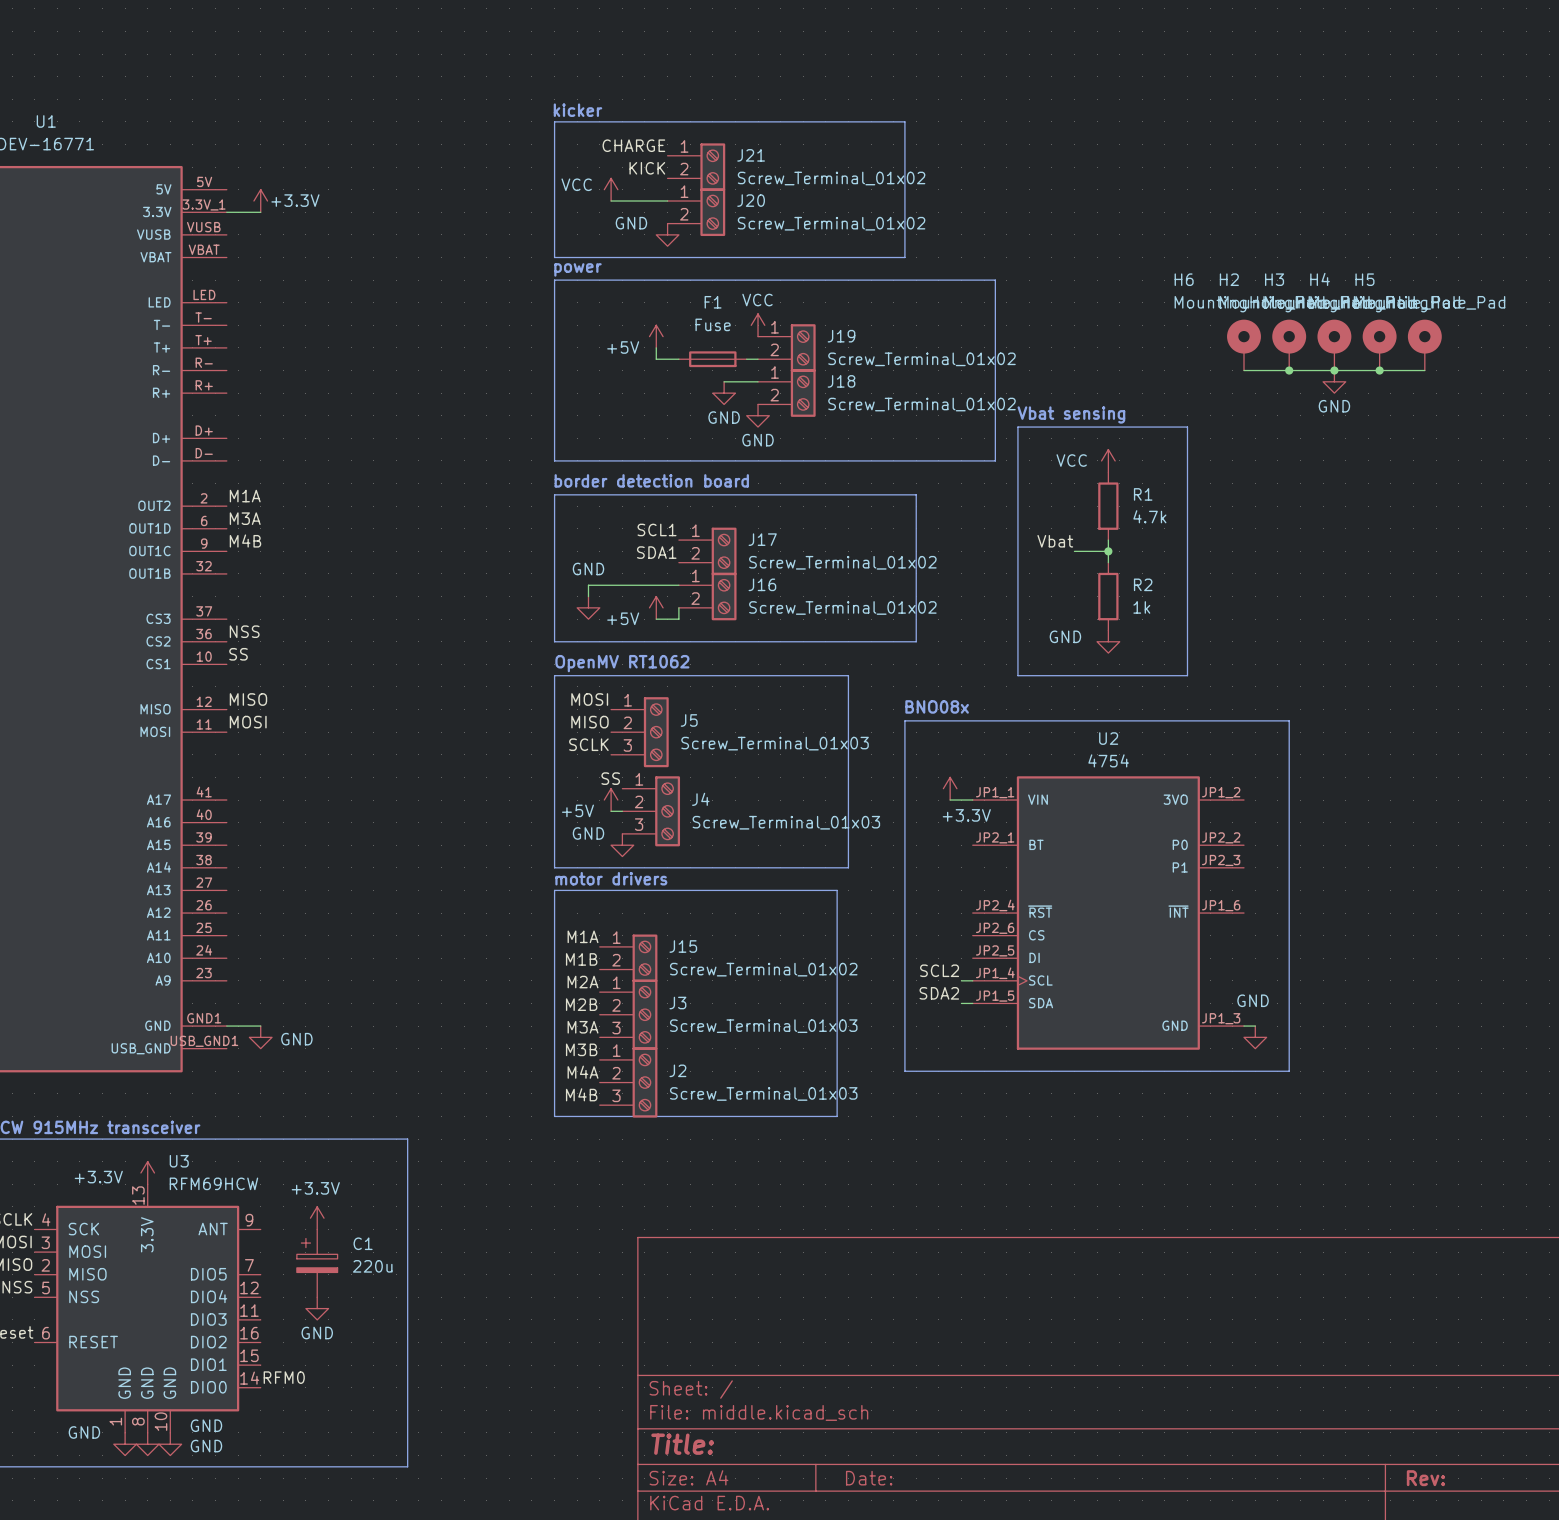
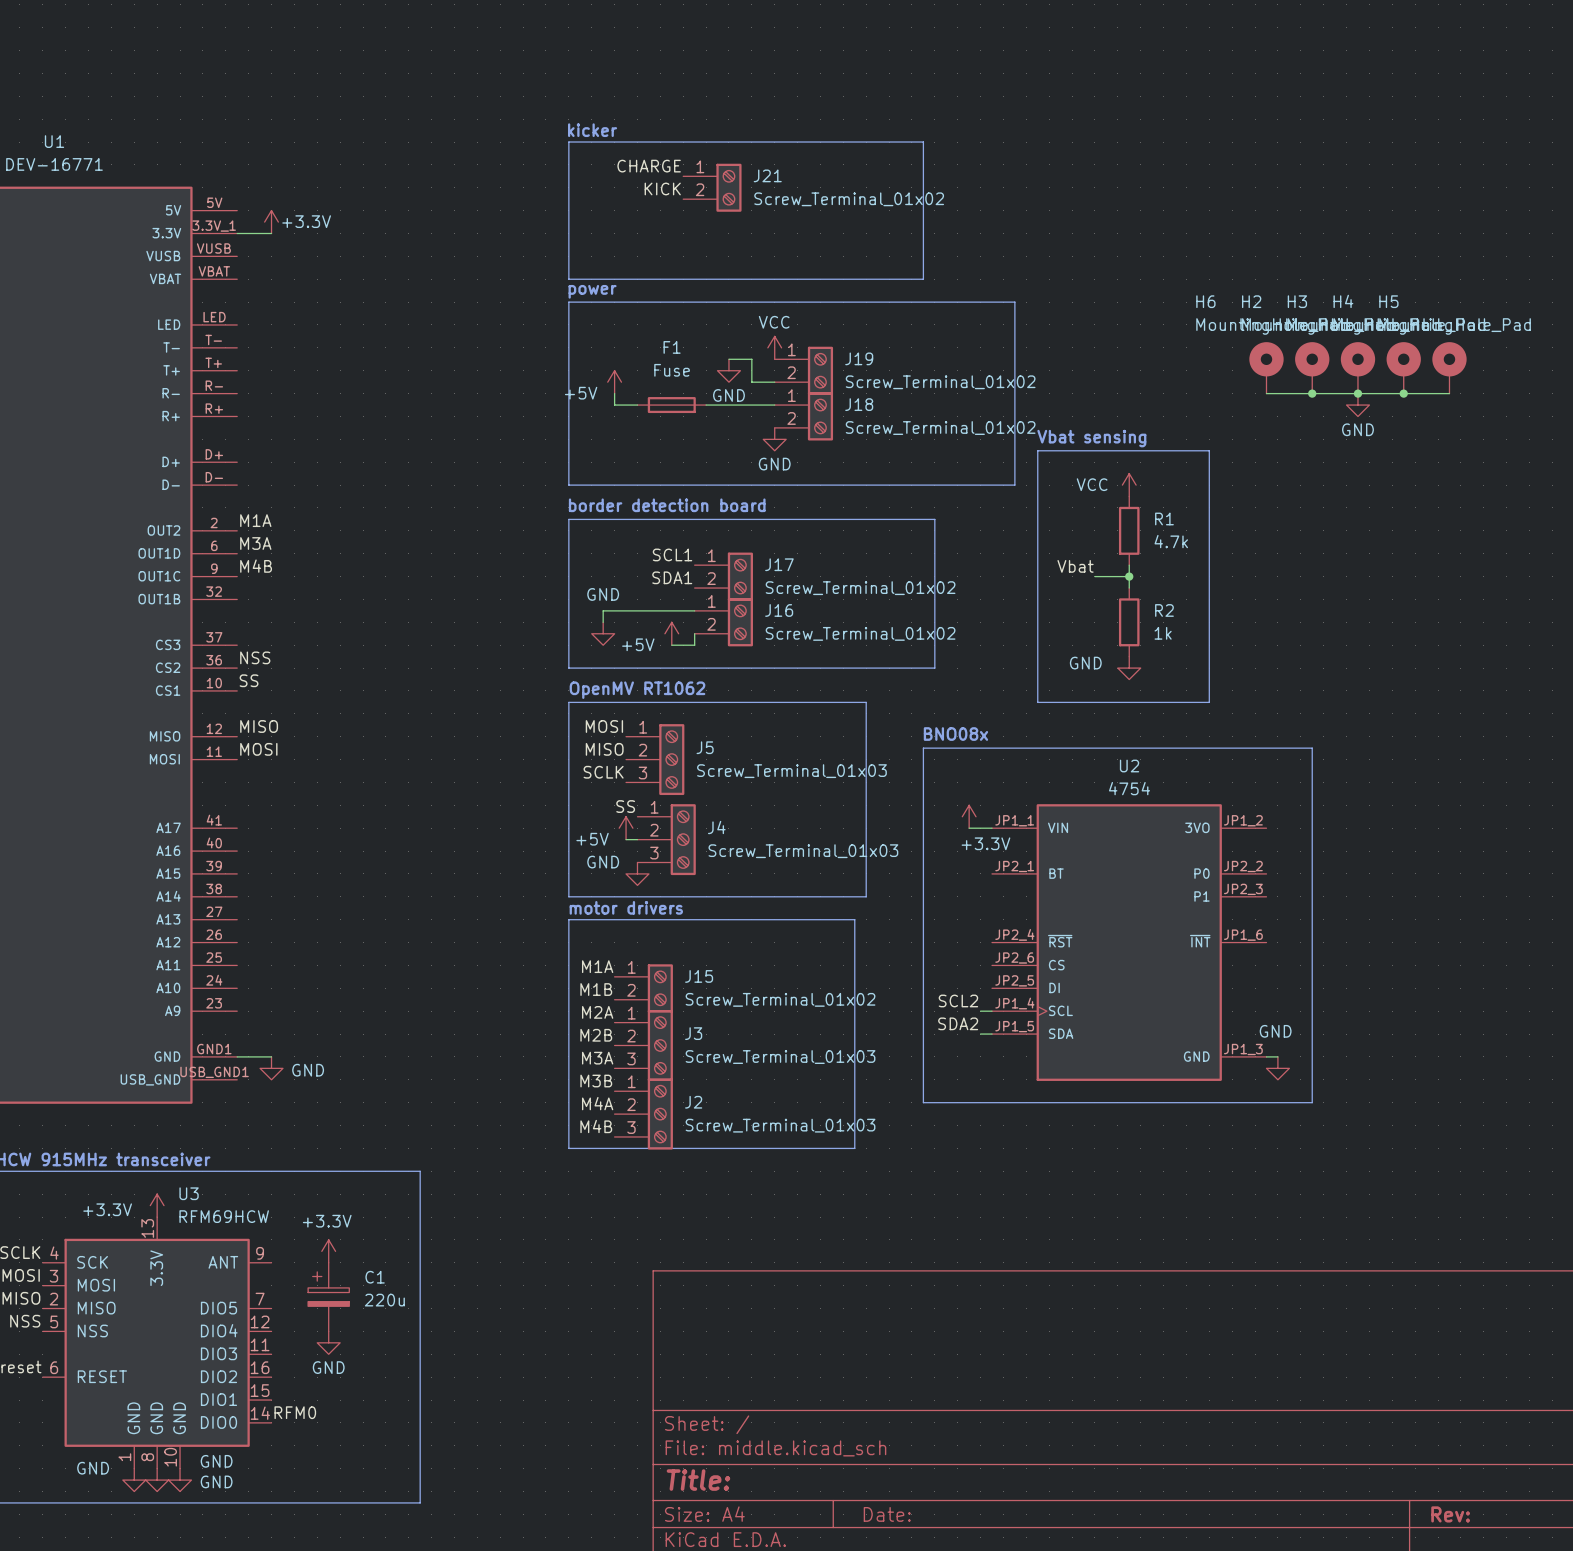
power symbol: VCC (611, 189) -> none
wire: (611, 201) (667, 201) -> none
J20: Screw_Terminal_01x02 (696, 212) -> none
power symbol: GND (667, 234) -> none
power symbol position: +5V (656, 336) -> +5V (614, 382)
wire: none -> (728, 359) (751, 359) (751, 382) (763, 382)
wire: (656, 347) (656, 359) (678, 359) -> (614, 393) (614, 405) (637, 405)
F1 position: (712, 359) -> (671, 405)
wire: none -> (706, 405) (740, 405)
power symbol position: GND (724, 393) -> GND (728, 370)

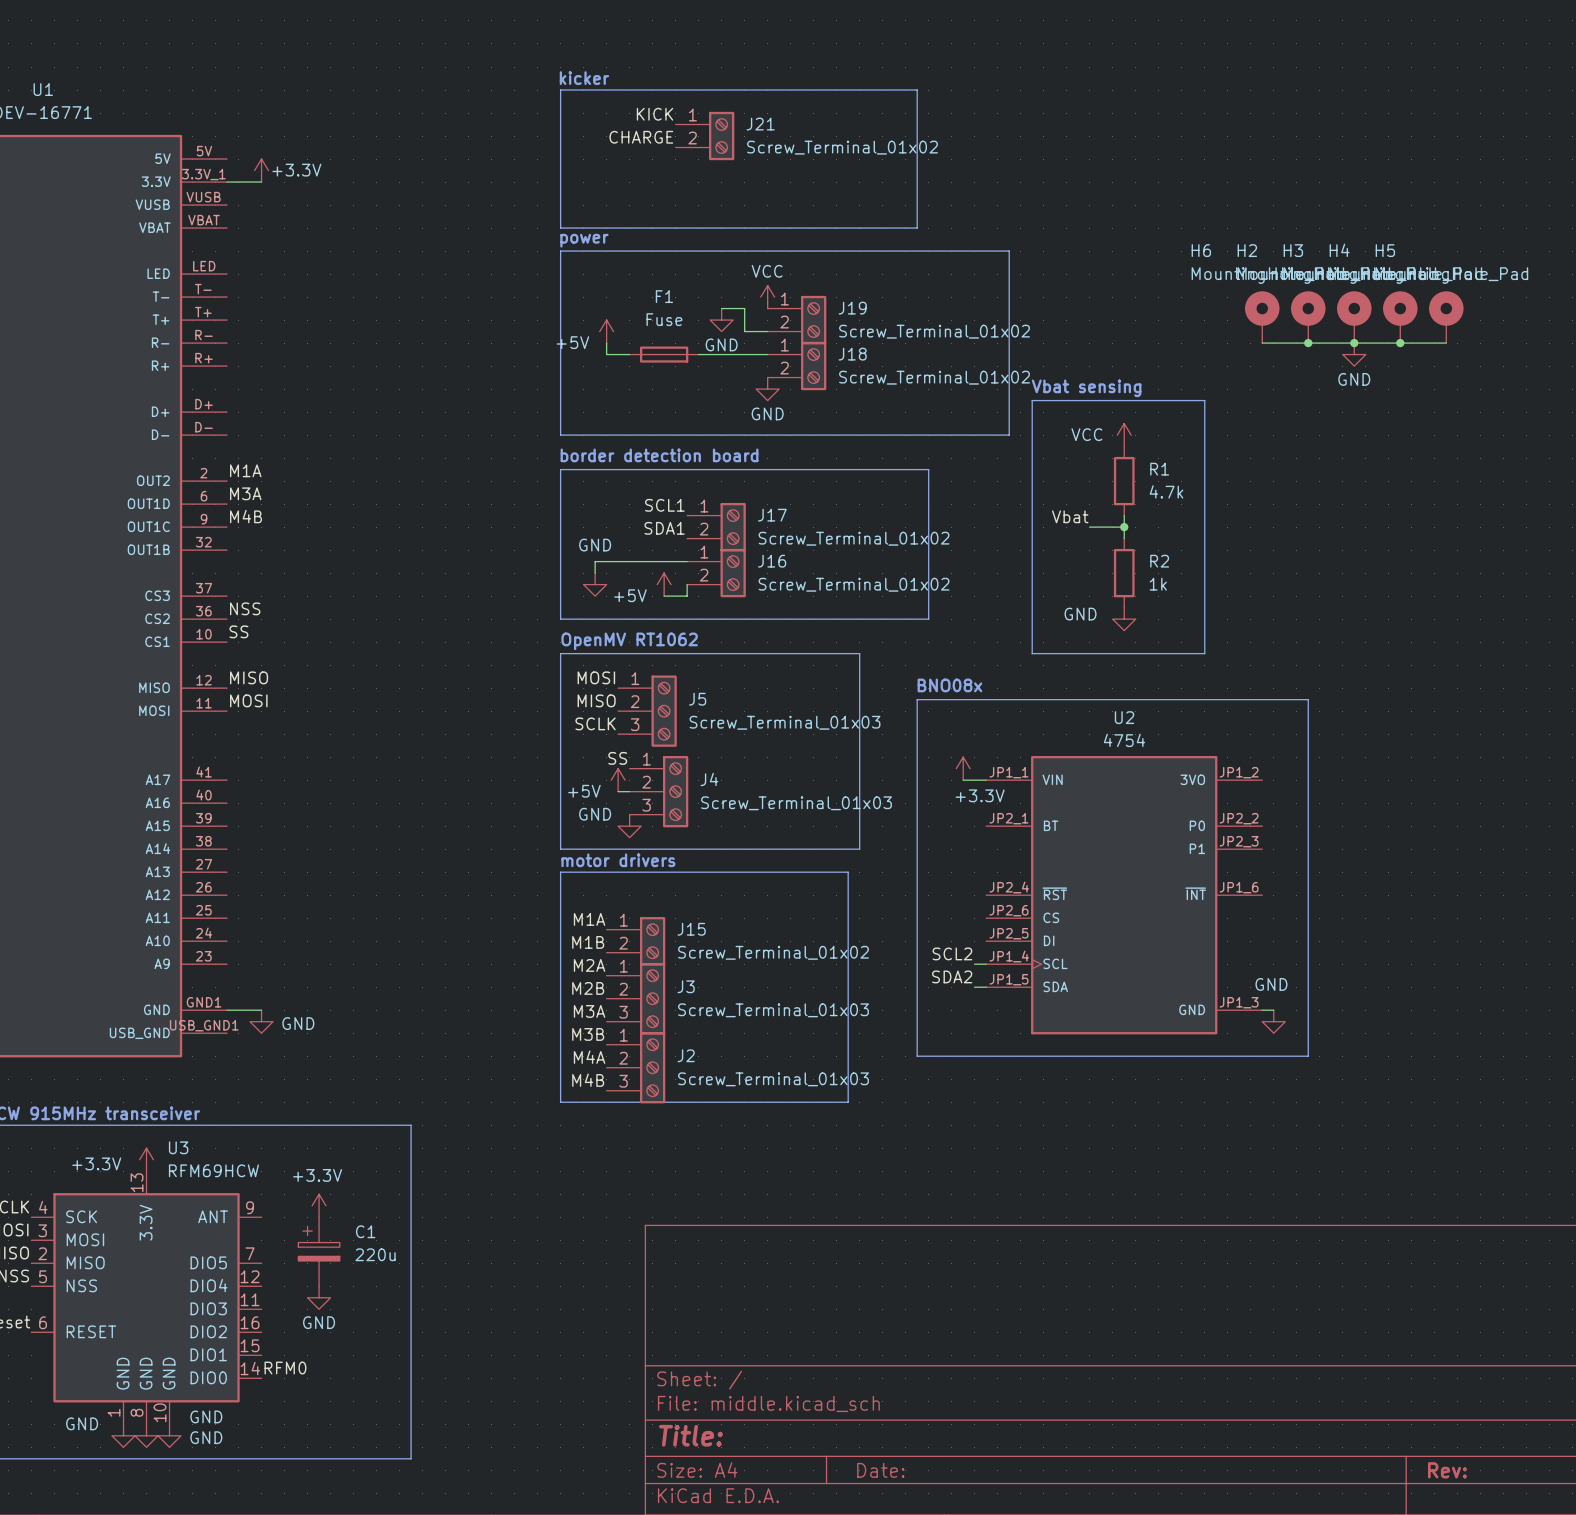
label: CHARGE (649, 166) -> KICK (655, 114)
label: KICK (662, 188) -> CHARGE (641, 137)

